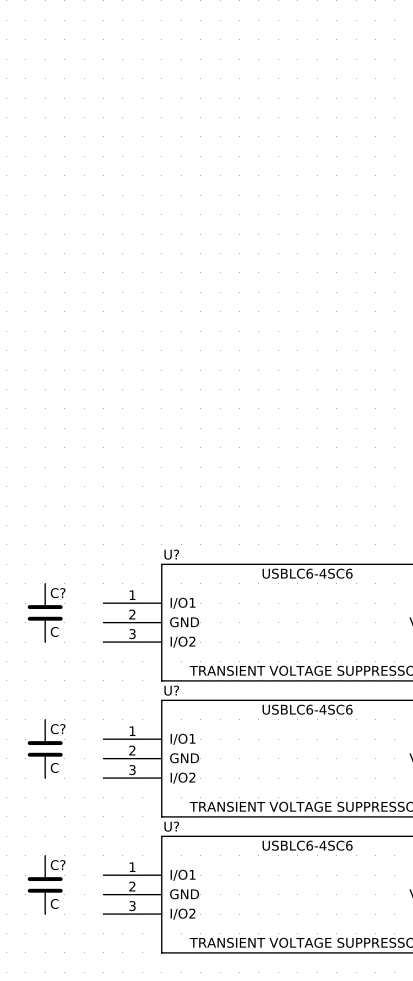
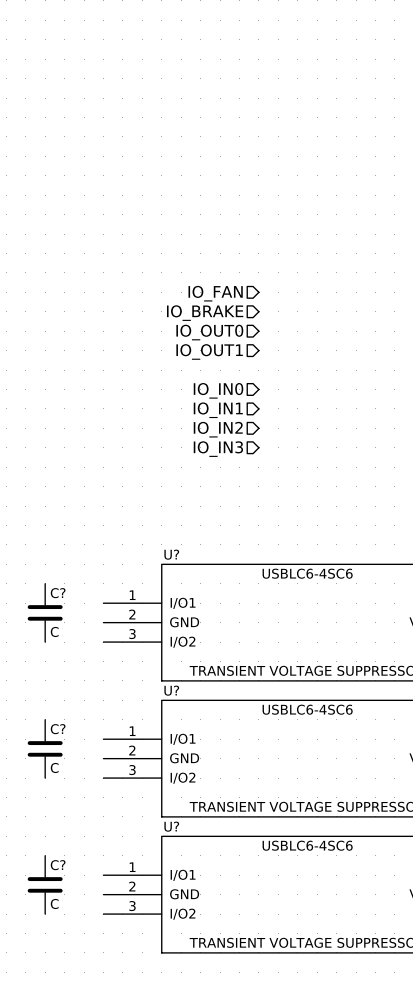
hierarchical label: none -> IO_FAN (215, 293)
hierarchical label: none -> IO_BRAKE (205, 313)
hierarchical label: none -> IO_OUT0 (209, 332)
hierarchical label: none -> IO_OUT1 (209, 351)
hierarchical label: none -> IO_IN0 (218, 390)
hierarchical label: none -> IO_IN1 (218, 410)
hierarchical label: none -> IO_IN2 (218, 429)
hierarchical label: none -> IO_IN3 (218, 449)

